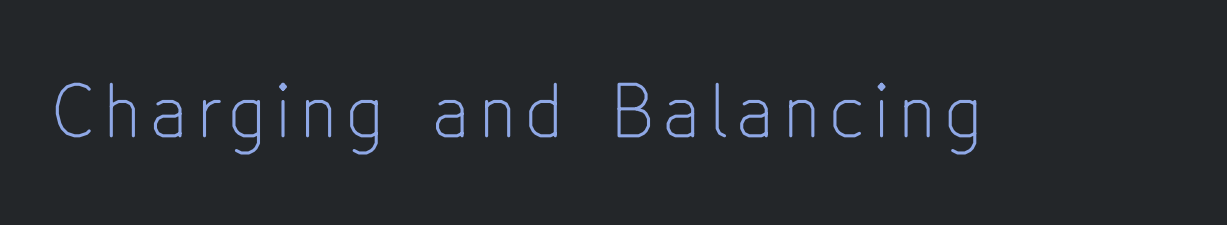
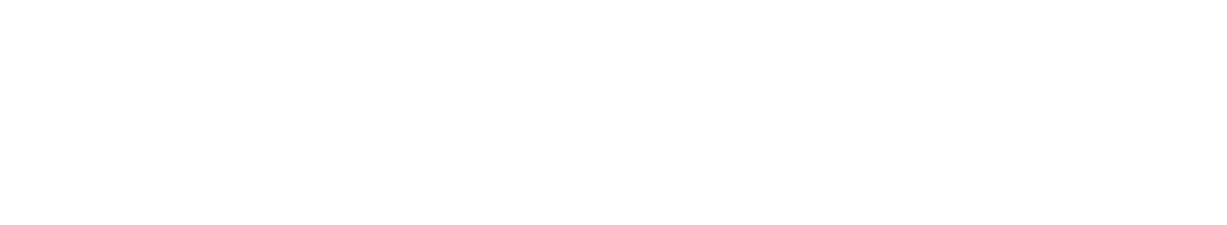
text: Charging and Balancing (516, 118) -> none

